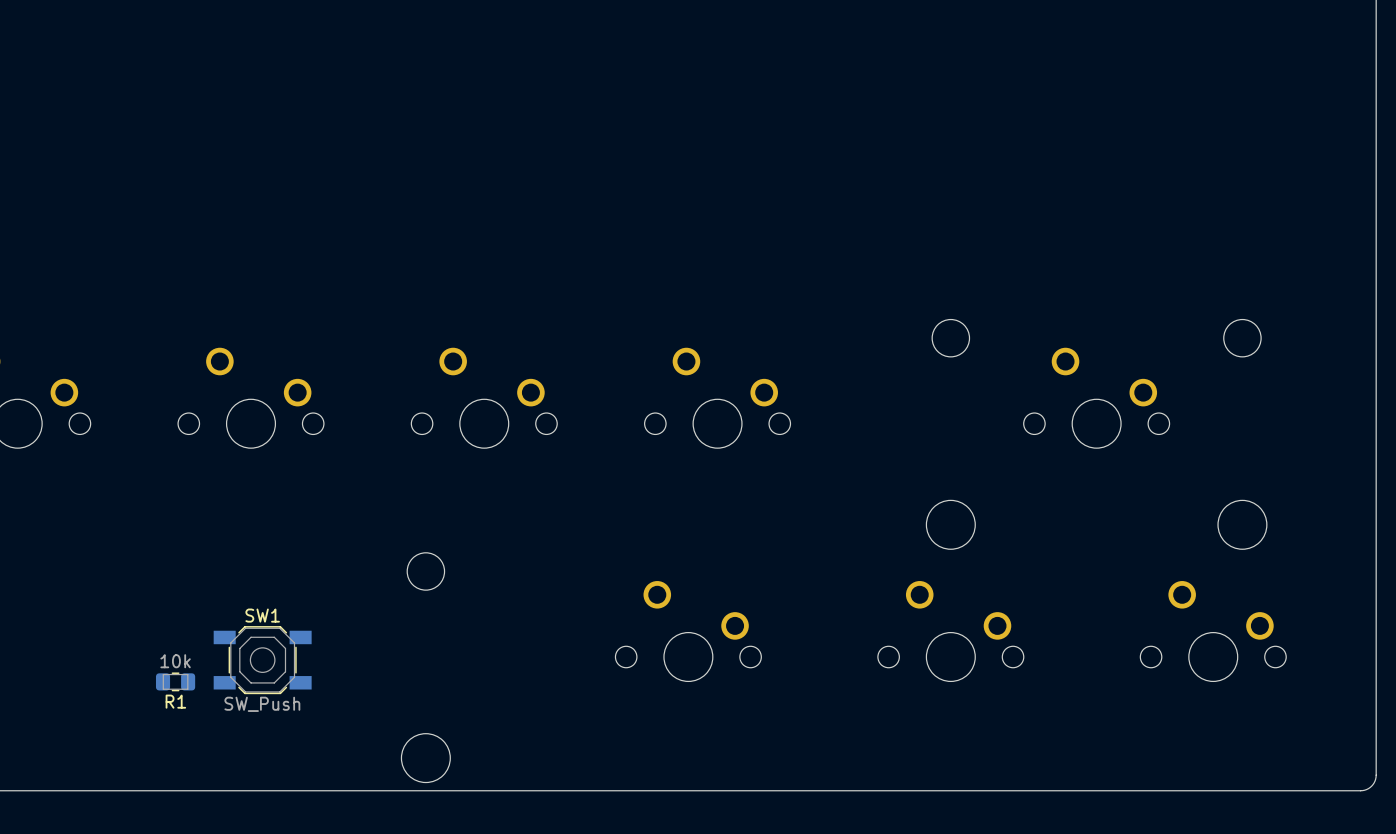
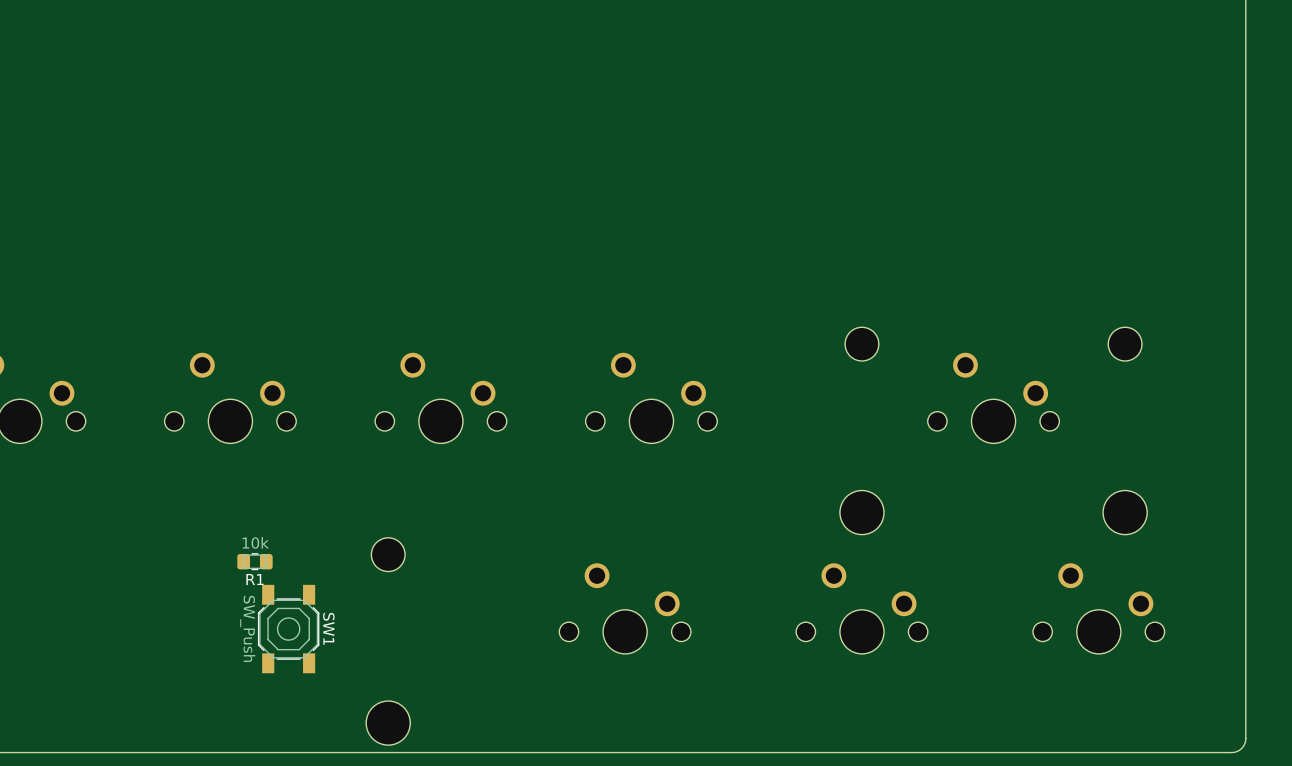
SW1 rotation: 0° (262, 660) -> 90° clockwise (288, 629)
R1 position: (175, 681) -> (254, 561)

